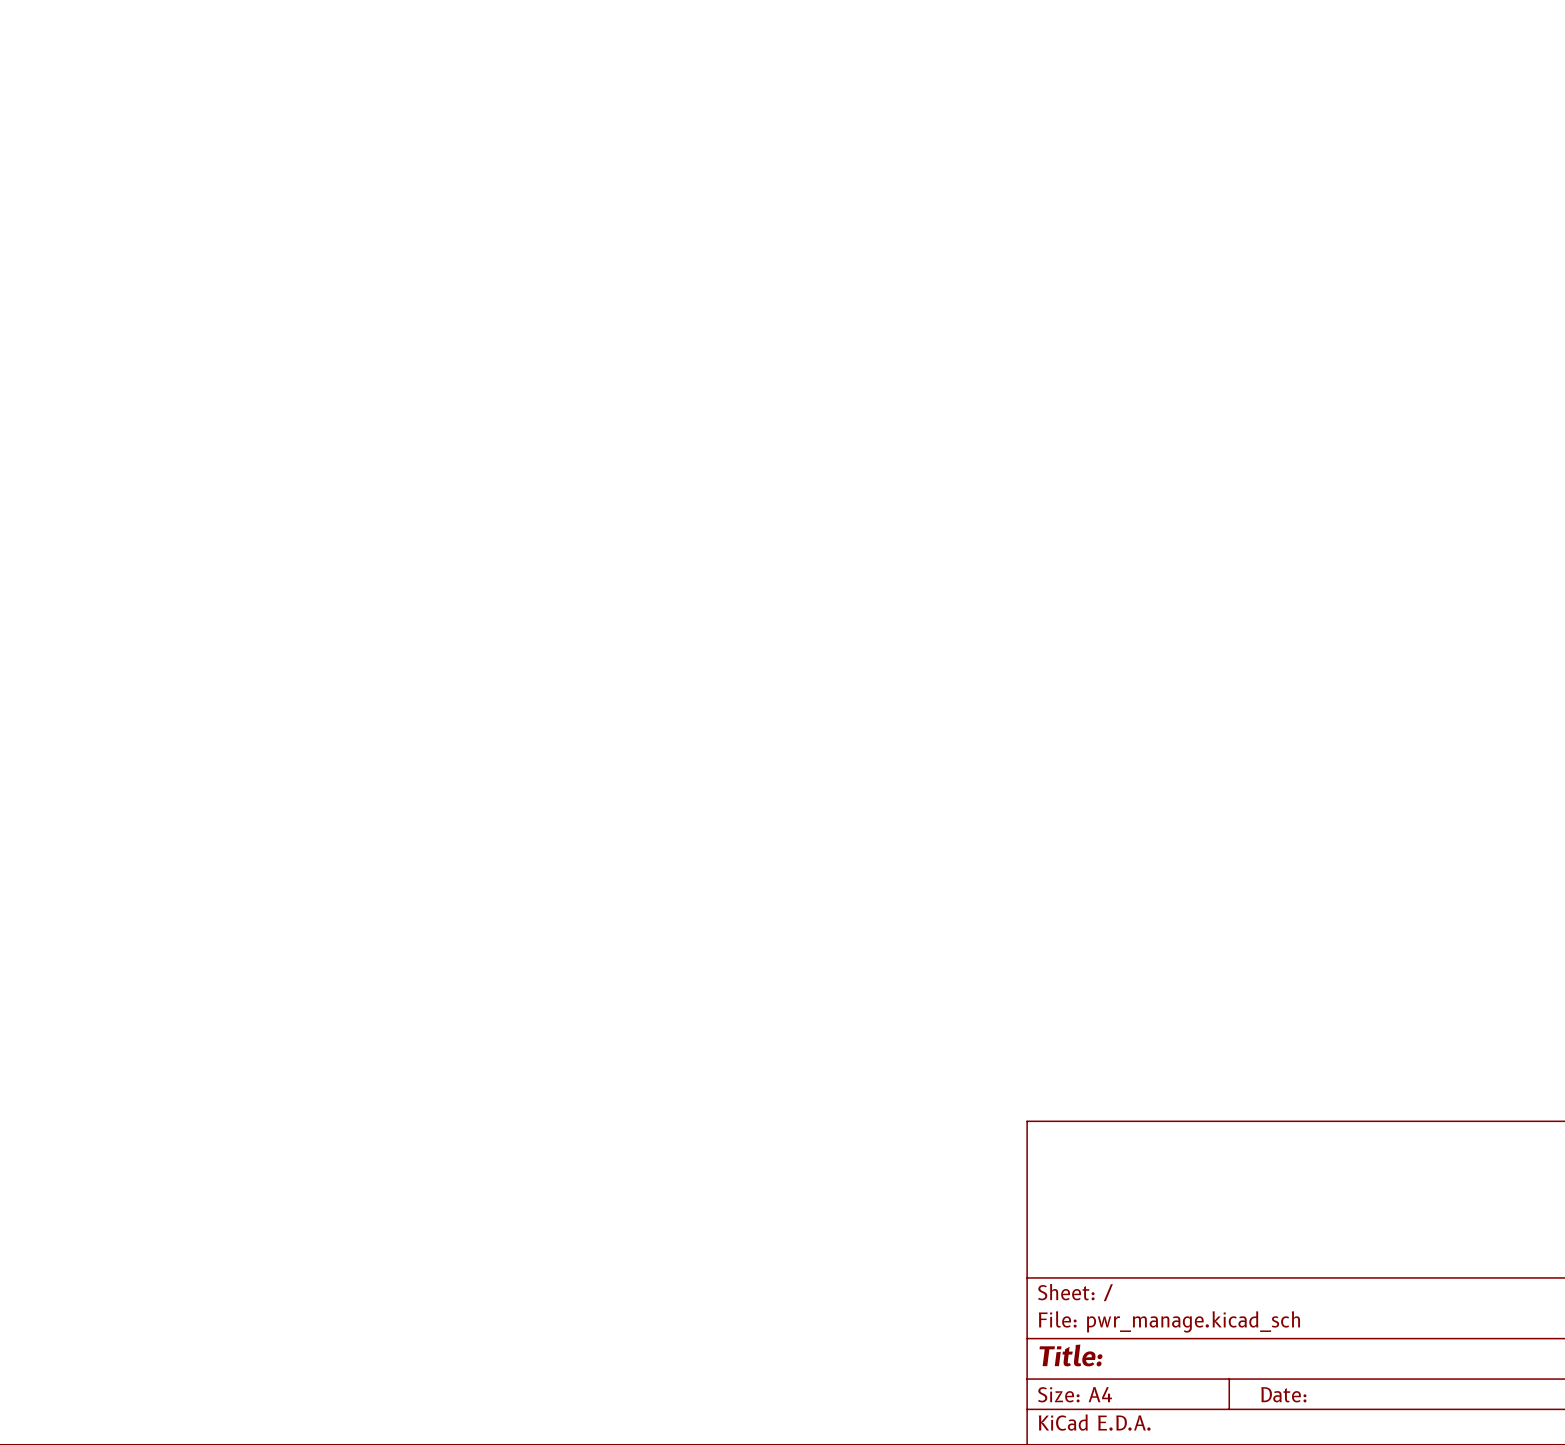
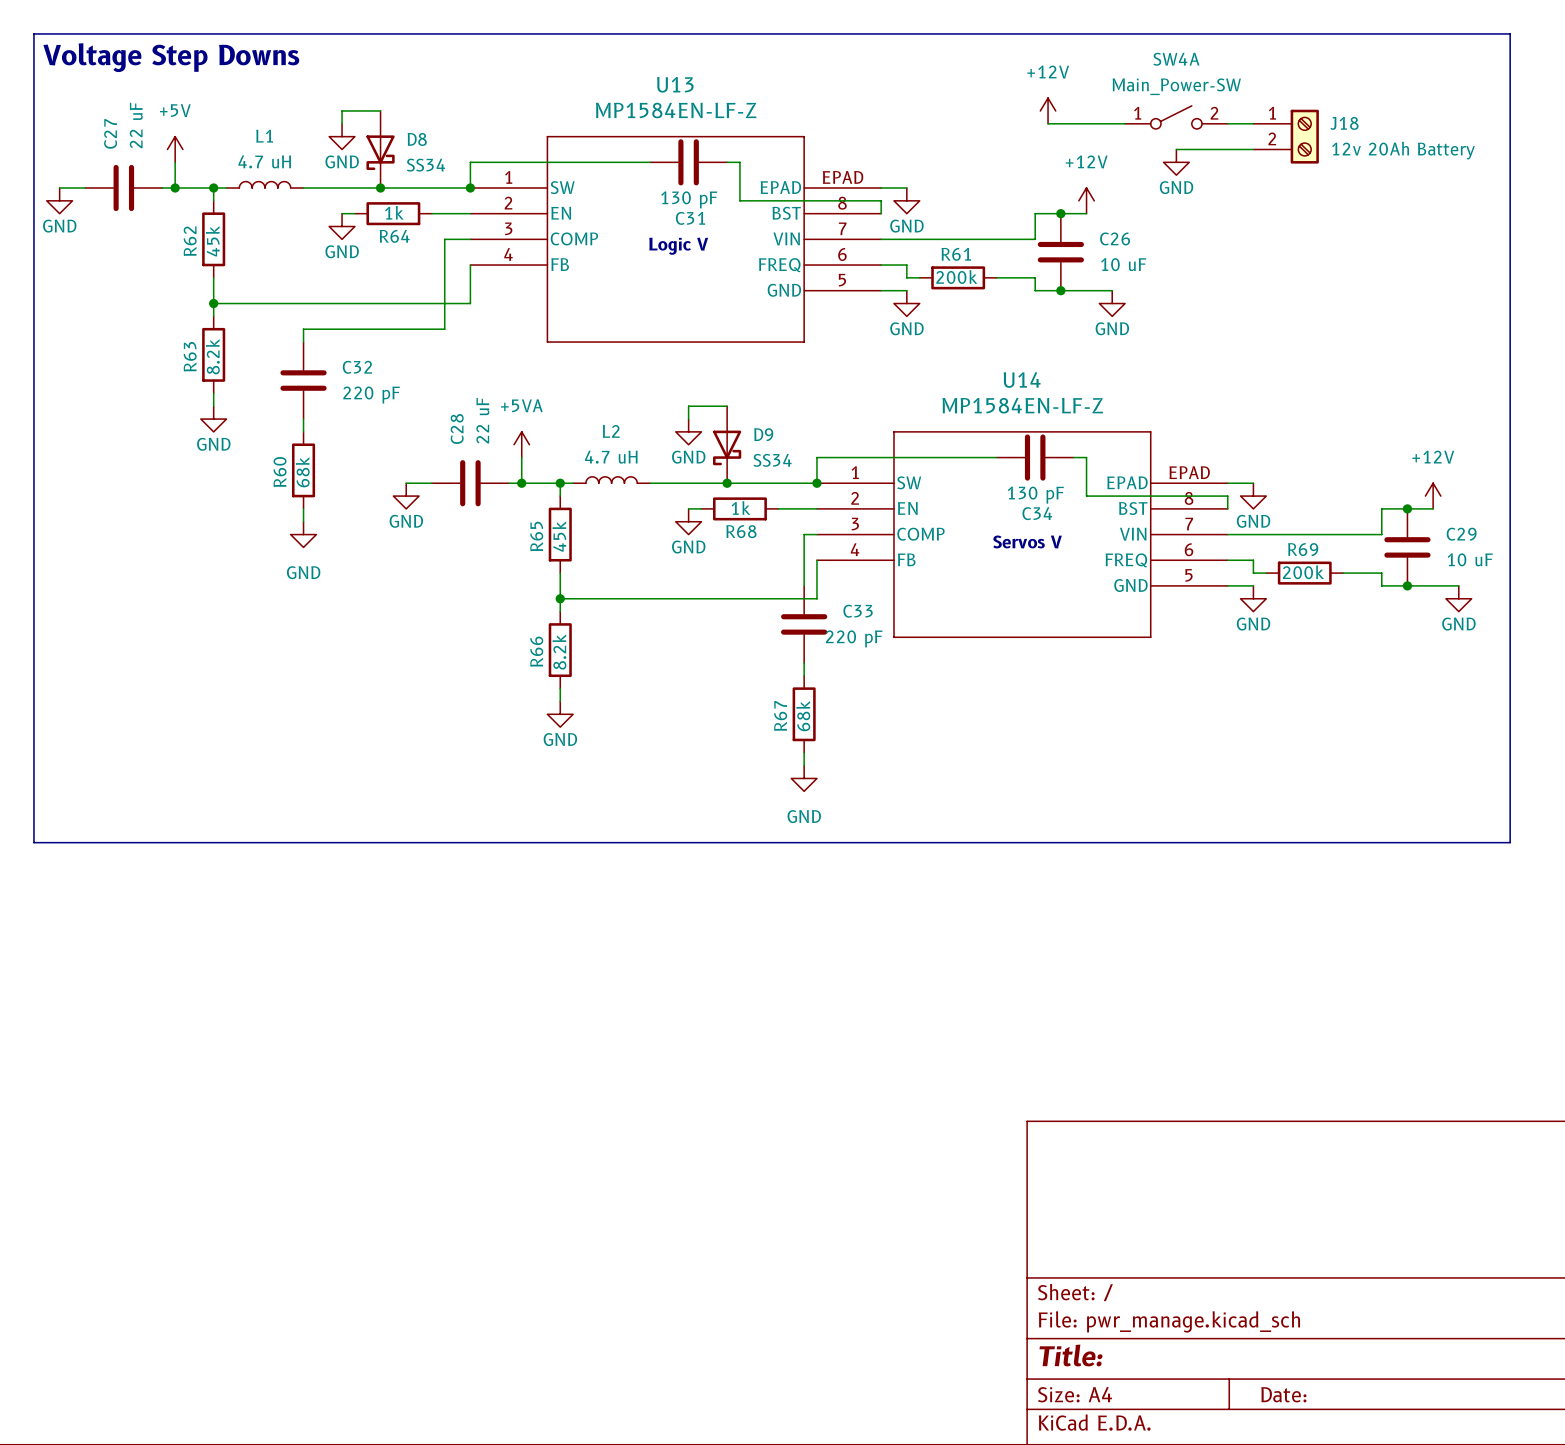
line: none -> (33, 33) (1510, 33) (1510, 842) (33, 842) (33, 33)
text: none -> Voltage Step Downs (171, 57)
wire: none -> (380, 110) (342, 110) (342, 123)
power symbol: none -> +12V (1048, 110)
SW4A: none -> Main_Power-SW (1176, 117)
wire: none -> (1048, 123) (1125, 123)
wire: none -> (1227, 123) (1253, 123)
power symbol: none -> GND (342, 136)
J18: none -> 12v 20Ah Battery (1286, 136)
power symbol: none -> +5V (175, 149)
D8: none -> SS34 (380, 149)
wire: none -> (1176, 149) (1253, 149)
wire: none -> (175, 162) (175, 188)
wire: none -> (650, 162) (470, 162) (470, 188) (303, 188)
C31: none -> 130 pF (688, 162)
wire: none -> (727, 162) (739, 162) (739, 200) (881, 200) (881, 213)
power symbol: none -> GND (1176, 162)
L1: none -> 4.7 uH (265, 184)
wire: none -> (59, 188) (85, 188)
C27: none -> 22 uF (123, 188)
wire: none -> (162, 188) (226, 188)
junction: none -> (175, 188)
wire: none -> (213, 188) (213, 200)
junction: none -> (213, 188)
junction: none -> (380, 188)
junction: none -> (470, 188)
wire: none -> (881, 188) (906, 188)
power symbol: none -> GND (59, 200)
power symbol: none -> GND (906, 200)
power symbol: none -> +12V (1086, 200)
wire: none -> (342, 213) (354, 213)
R64: none -> 1k (393, 213)
wire: none -> (431, 213) (470, 213)
junction: none -> (1060, 213)
wire: none -> (1086, 213) (1035, 213) (1035, 239) (881, 239)
power symbol: none -> GND (342, 226)
R62: none -> 45k (213, 239)
wire: none -> (470, 239) (444, 239) (444, 329) (303, 329) (303, 342)
U13: none -> MP1584EN-LF-Z (675, 239)
text: none -> Logic V (678, 246)
C26: none -> 10 uF (1060, 252)
wire: none -> (470, 265) (470, 303) (213, 303)
wire: none -> (881, 265) (906, 265) (906, 277) (919, 277)
wire: none -> (213, 277) (213, 316)
R61: none -> 200k (958, 277)
wire: none -> (996, 277) (1035, 277) (1035, 290) (1112, 290)
wire: none -> (881, 290) (906, 290)
junction: none -> (1060, 290)
junction: none -> (213, 303)
power symbol: none -> GND (906, 303)
power symbol: none -> GND (1112, 303)
R63: none -> 8.2k (213, 354)
C32: none -> 220 pF (303, 380)
wire: none -> (213, 393) (213, 406)
wire: none -> (727, 406) (688, 406) (688, 419)
power symbol: none -> GND (213, 419)
wire: none -> (303, 419) (303, 431)
power symbol: none -> GND (688, 431)
power symbol: none -> +5VA (521, 444)
D9: none -> SS34 (727, 444)
wire: none -> (521, 457) (521, 483)
wire: none -> (996, 457) (816, 457) (816, 483) (650, 483)
C34: none -> 130 pF (1035, 457)
wire: none -> (1073, 457) (1086, 457) (1086, 496) (1227, 496) (1227, 508)
R60: none -> 68k (303, 470)
L2: none -> 4.7 uH (611, 480)
wire: none -> (406, 483) (431, 483)
C28: none -> 22 uF (470, 483)
wire: none -> (508, 483) (573, 483)
junction: none -> (521, 483)
wire: none -> (560, 483) (560, 496)
junction: none -> (560, 483)
junction: none -> (727, 483)
junction: none -> (816, 483)
wire: none -> (1227, 483) (1253, 483)
power symbol: none -> GND (406, 496)
power symbol: none -> GND (1253, 496)
power symbol: none -> +12V (1433, 496)
wire: none -> (303, 508) (303, 521)
wire: none -> (688, 508) (701, 508)
R68: none -> 1k (739, 508)
wire: none -> (778, 508) (816, 508)
junction: none -> (1407, 508)
wire: none -> (1433, 508) (1381, 508) (1381, 534) (1227, 534)
power symbol: none -> GND (688, 521)
power symbol: none -> GND (303, 534)
R65: none -> 45k (560, 534)
wire: none -> (816, 534) (804, 534) (804, 585)
U14: none -> MP1584EN-LF-Z (1022, 534)
text: none -> Servos V (1027, 541)
C29: none -> 10 uF (1407, 547)
wire: none -> (816, 560) (816, 598) (560, 598)
wire: none -> (1227, 560) (1253, 560) (1253, 573) (1266, 573)
wire: none -> (560, 573) (560, 611)
R69: none -> 200k (1304, 573)
wire: none -> (1343, 573) (1381, 573) (1381, 585) (1458, 585)
wire: none -> (1227, 585) (1253, 585)
junction: none -> (1407, 585)
junction: none -> (560, 598)
power symbol: none -> GND (1253, 598)
power symbol: none -> GND (1458, 598)
C33: none -> 220 pF (804, 624)
R66: none -> 8.2k (560, 650)
wire: none -> (804, 662) (804, 675)
wire: none -> (560, 688) (560, 701)
power symbol: none -> GND (560, 714)
R67: none -> 68k (804, 714)
wire: none -> (804, 752) (804, 765)
power symbol: none -> GND (804, 778)

